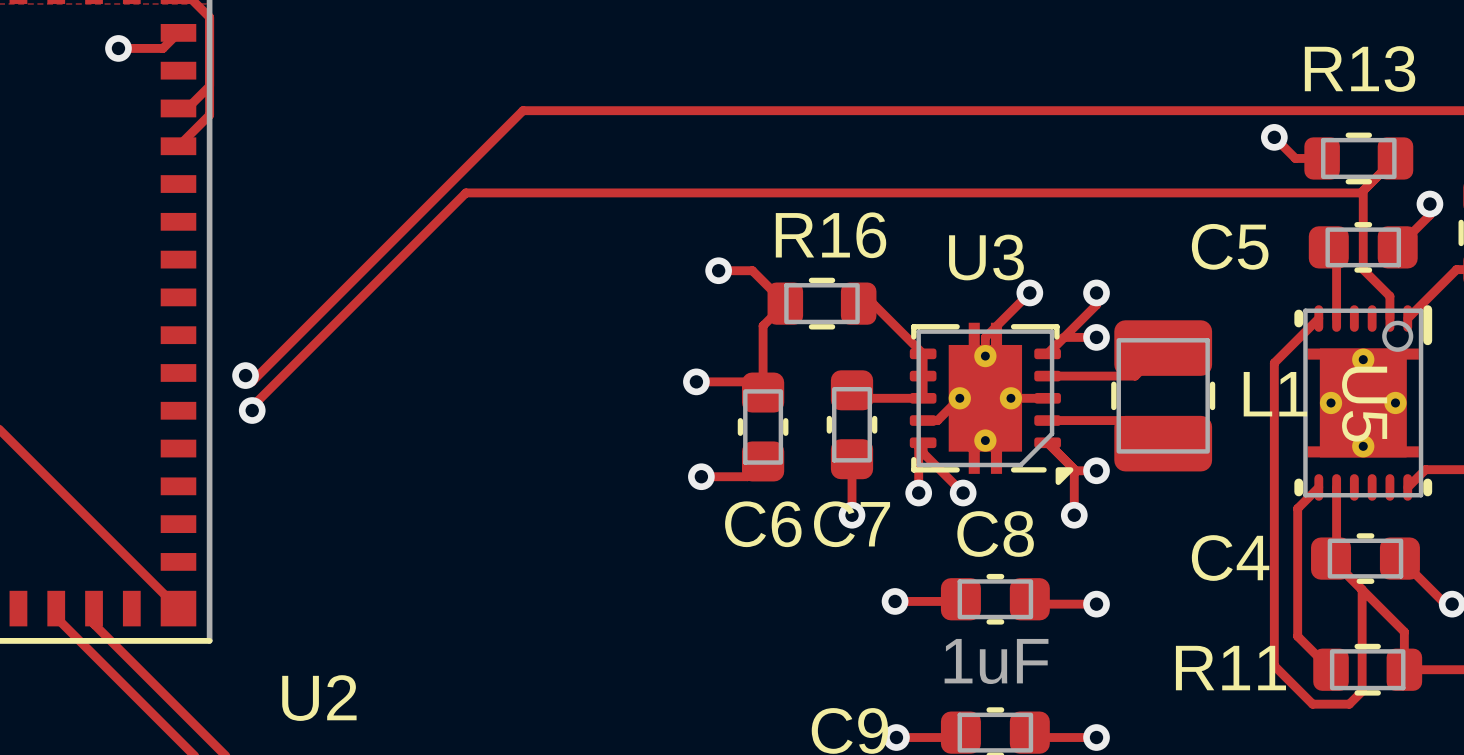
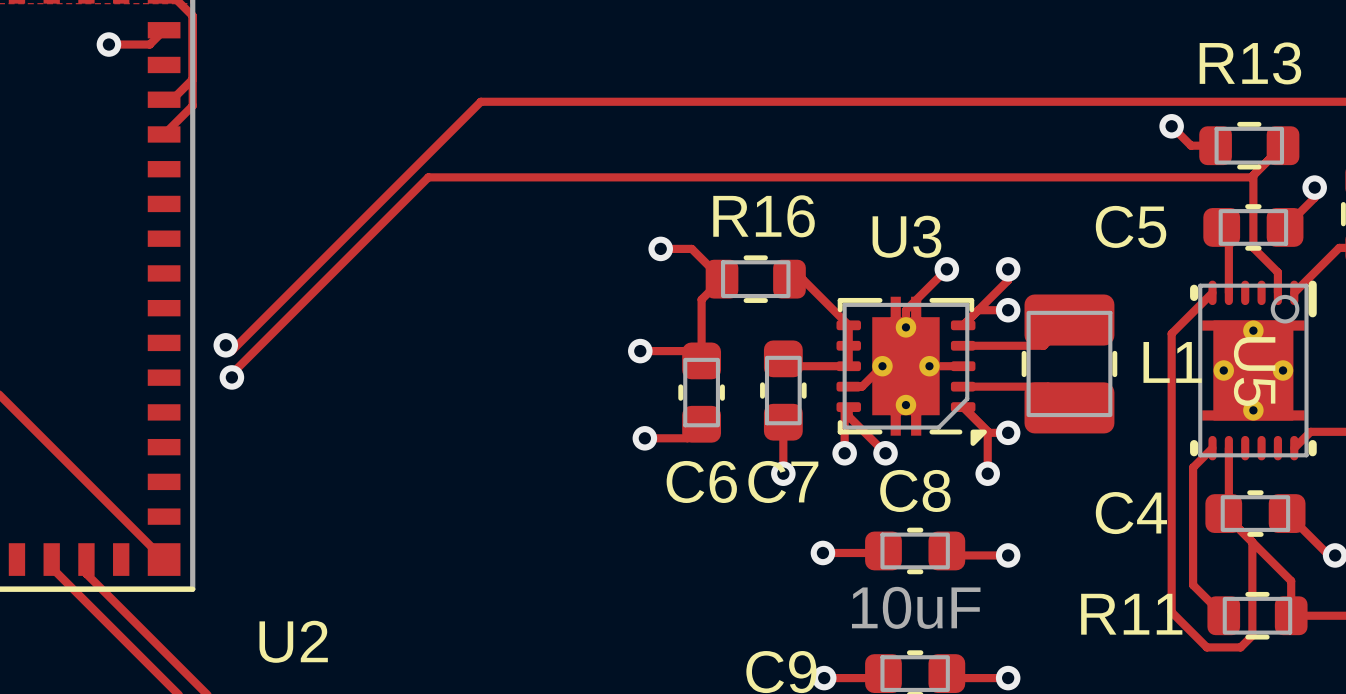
C8 value: 1uF (996, 661) -> 10uF (916, 607)

